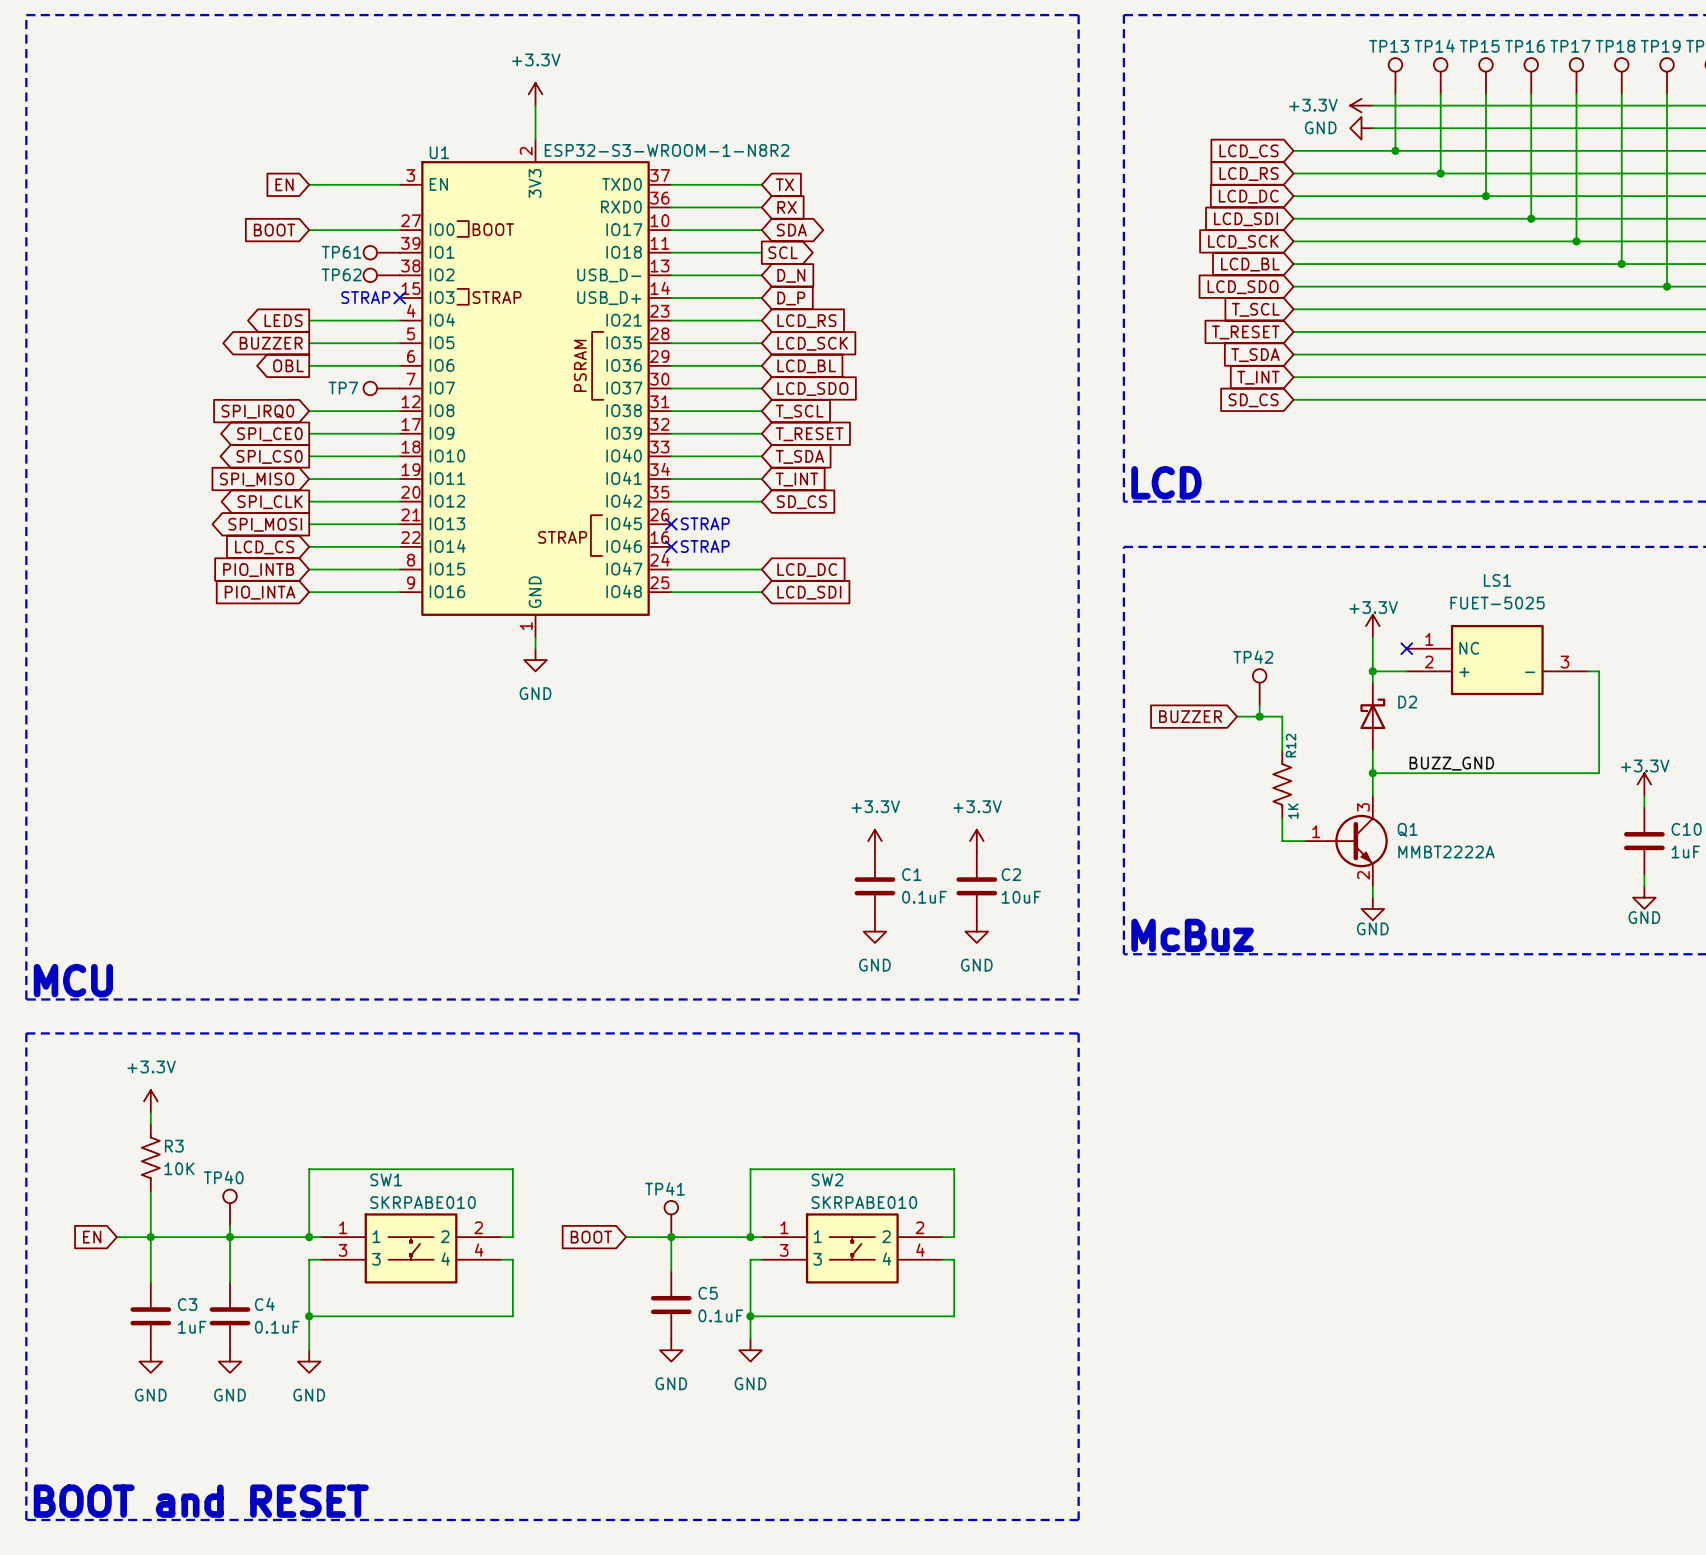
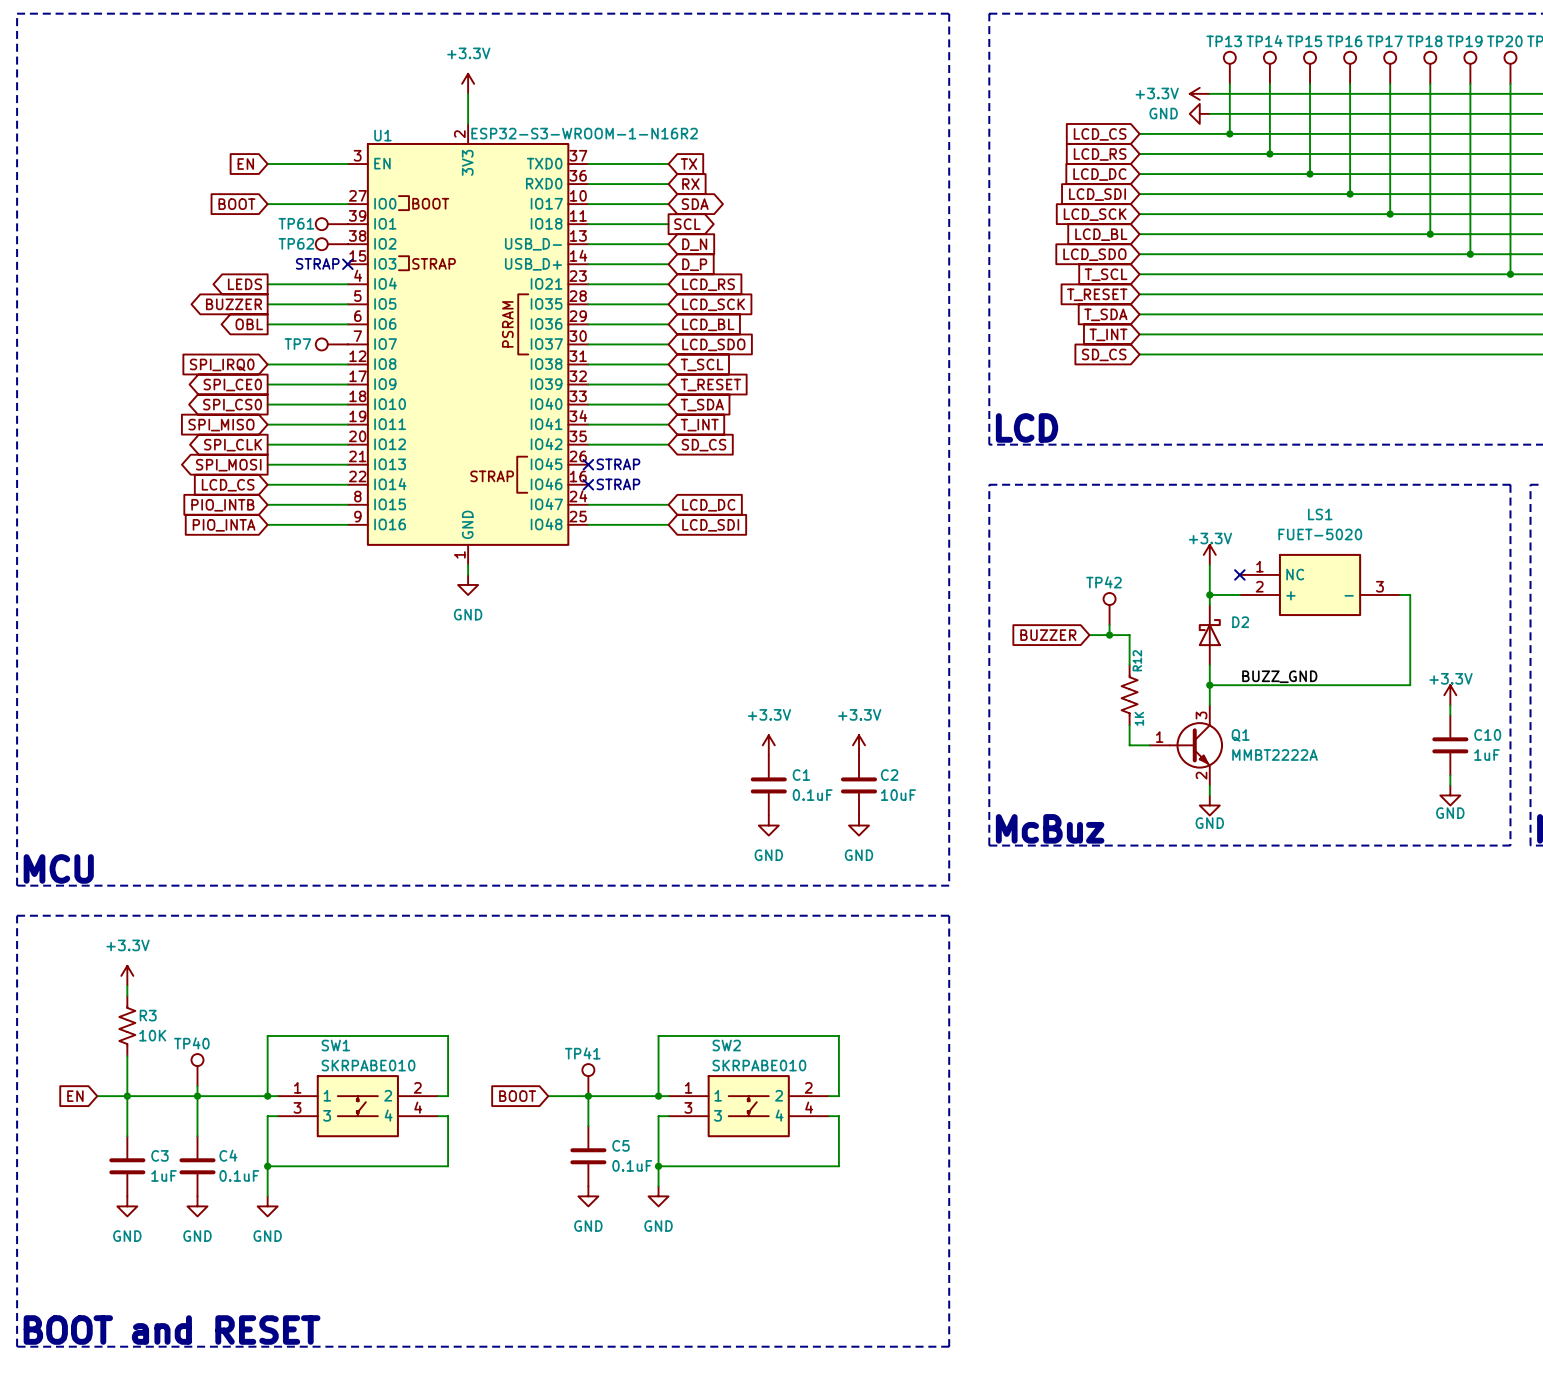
U1 value: ESP32-S3-WROOM-1-N8R2 (667, 150) -> ESP32-S3-WROOM-1-N16R2 (584, 133)
LS1 value: FUET-5025 (1497, 603) -> FUET-5020 (1320, 534)

